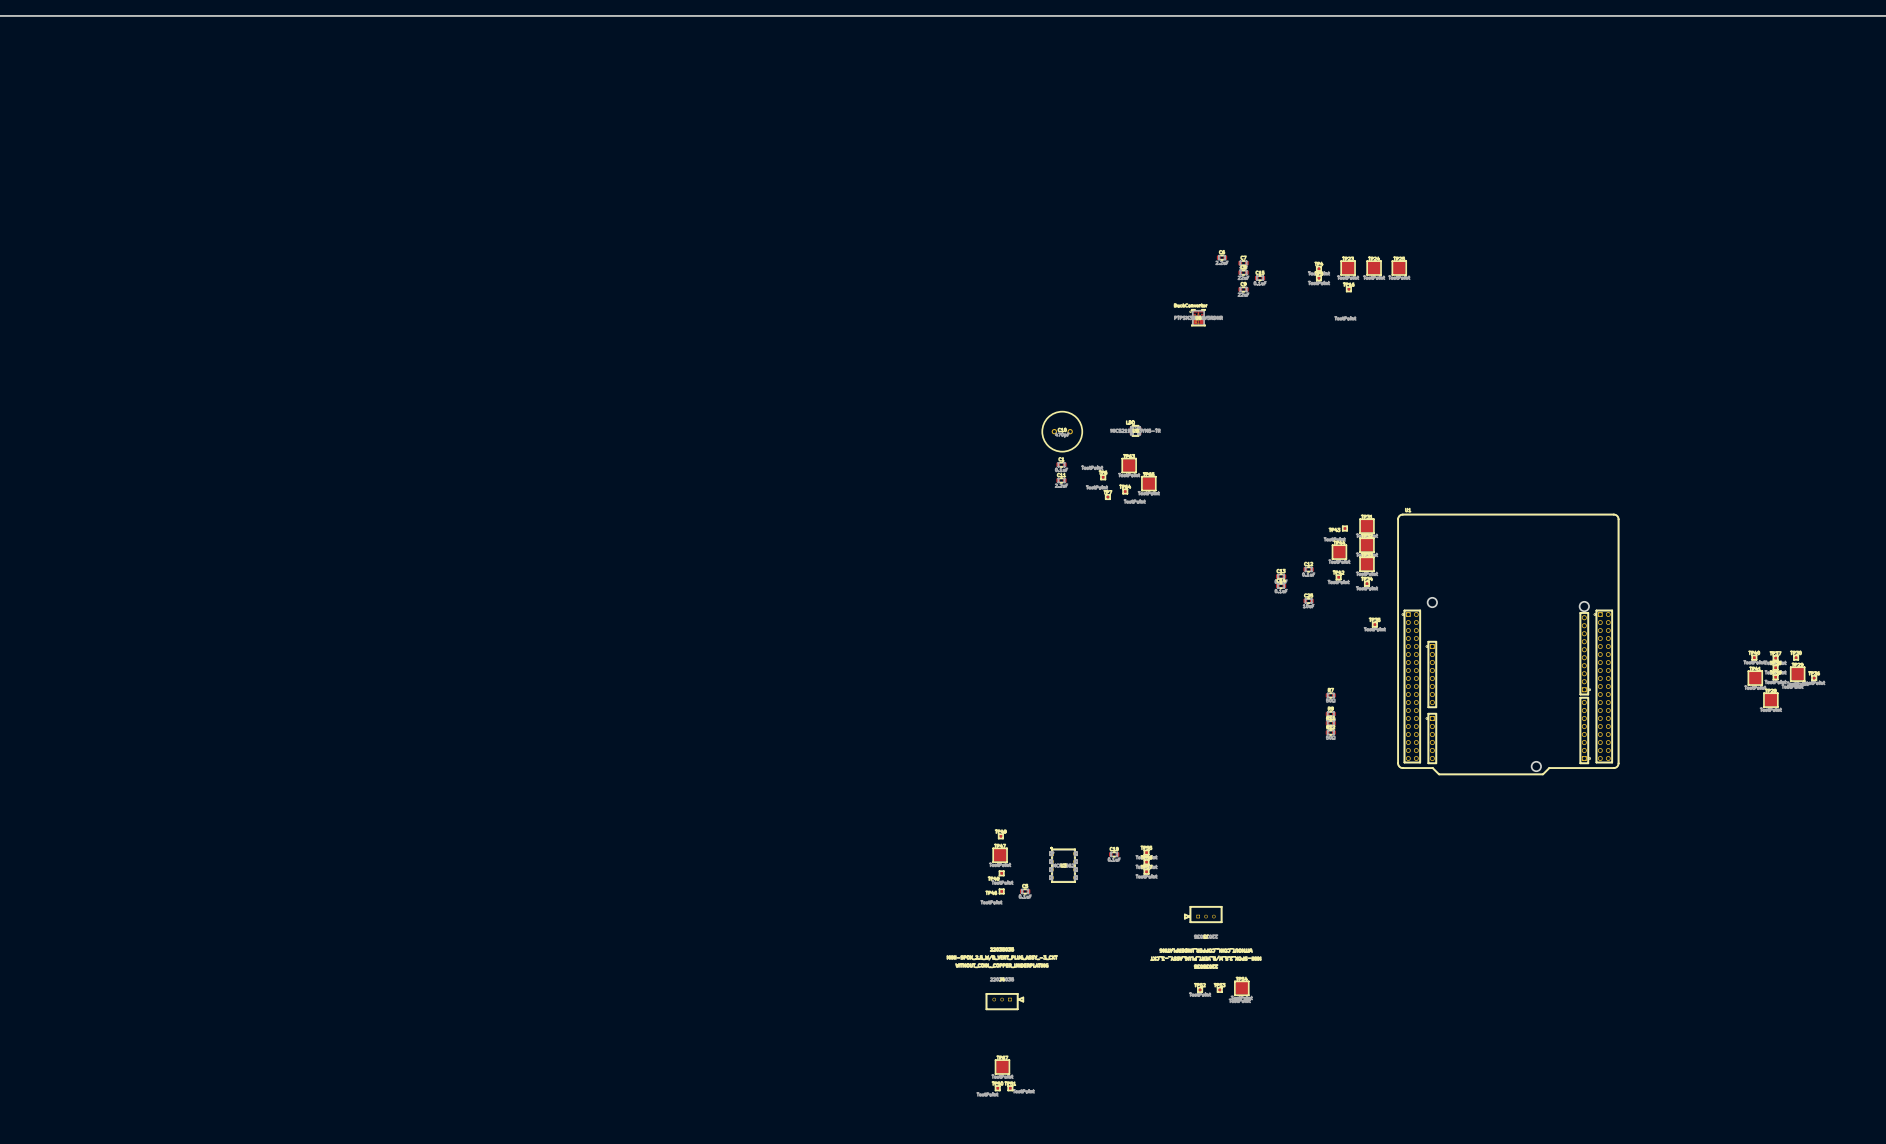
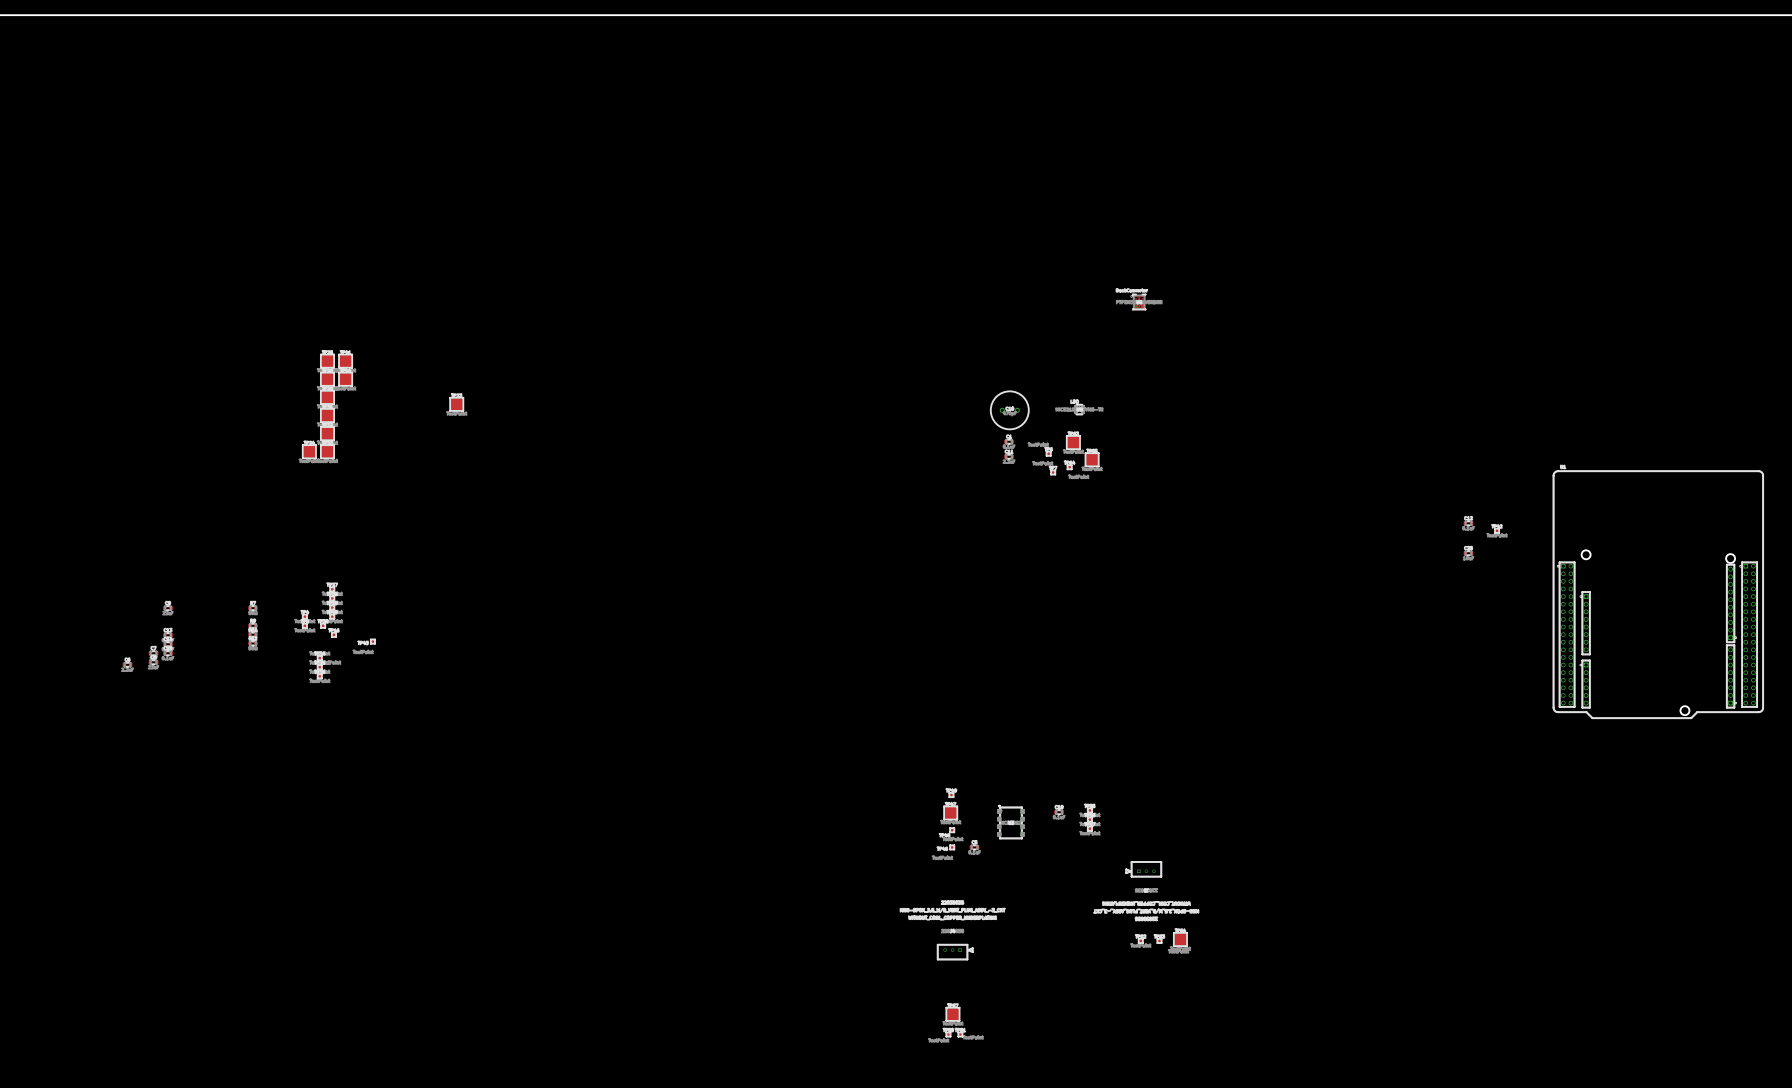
part position: (1222, 257) -> (127, 664)
part position: (1243, 263) -> (153, 653)
part position: (1318, 268) -> (304, 616)
part position: (1348, 268) -> (456, 404)
part position: (1374, 268) -> (309, 451)
part position: (1399, 268) -> (327, 361)
part position: (1243, 272) -> (153, 662)
part position: (1260, 278) -> (167, 653)
part position: (1318, 278) -> (304, 625)
part position: (1243, 289) -> (167, 608)
part position: (1348, 289) -> (333, 634)
part position: (1367, 526) -> (327, 415)
part position: (1344, 528) -> (372, 641)
part position: (1367, 545) -> (327, 433)
part position: (1339, 552) -> (345, 379)
part position: (1367, 564) -> (327, 451)
part position: (1308, 569) -> (1468, 523)
part position: (1281, 576) -> (167, 635)
part position: (1338, 577) -> (1497, 530)
part position: (1367, 583) -> (319, 658)
part position: (1281, 585) -> (167, 644)
part position: (1308, 600) -> (1468, 553)
part position: (1374, 624) -> (319, 667)
part position: (1508, 644) -> (1658, 594)
part position: (1754, 657) -> (332, 616)
part position: (1796, 657) -> (323, 625)
part position: (1775, 658) -> (332, 589)
part position: (1775, 667) -> (332, 598)
part position: (1797, 674) -> (327, 397)
part position: (1775, 677) -> (332, 607)
part position: (1755, 678) -> (345, 361)
part position: (1814, 678) -> (319, 676)
part position: (1330, 695) -> (253, 608)
part position: (1770, 700) -> (327, 379)
part position: (1330, 714) -> (253, 625)
part position: (1330, 723) -> (253, 634)
part position: (1330, 732) -> (253, 643)

